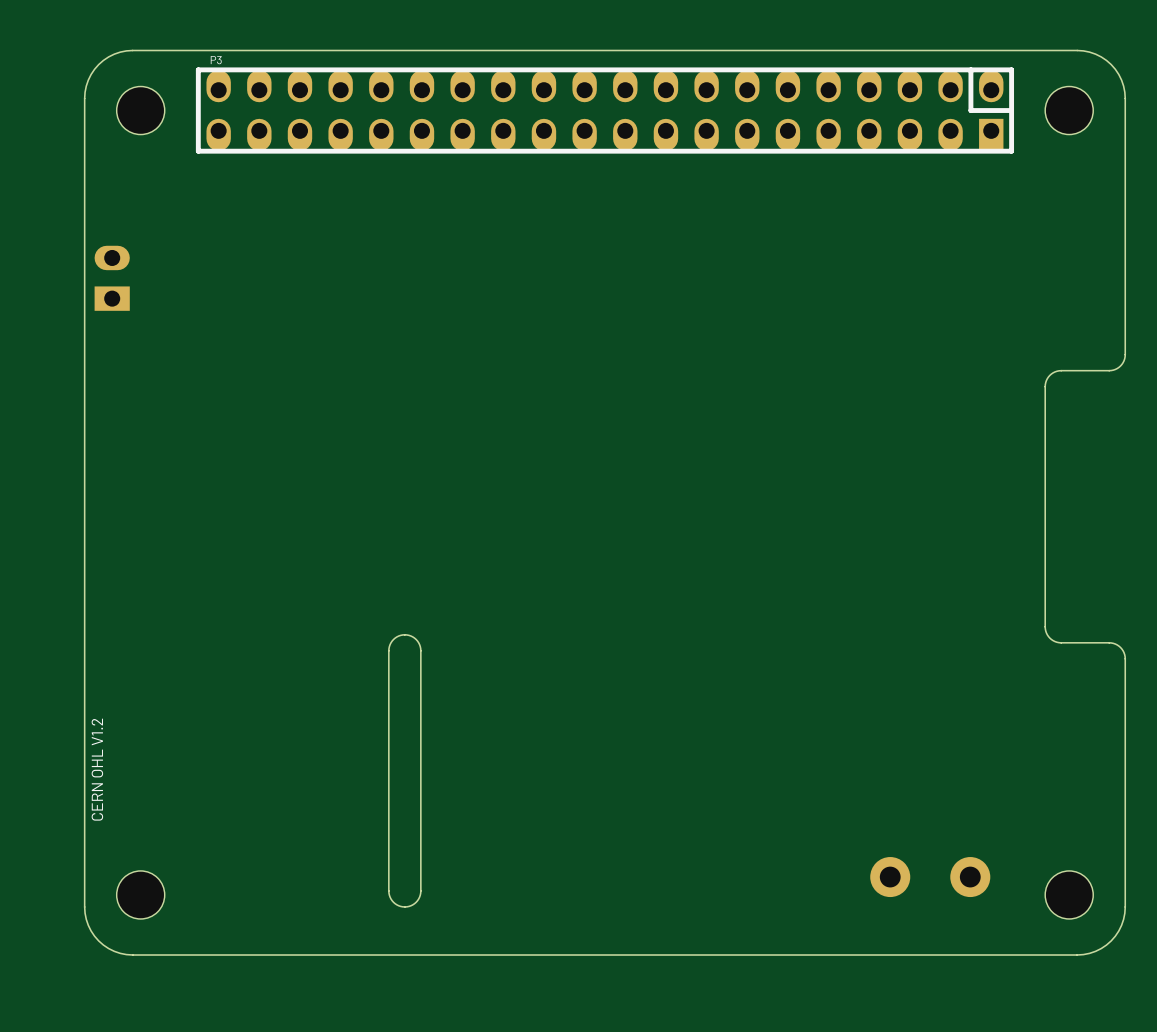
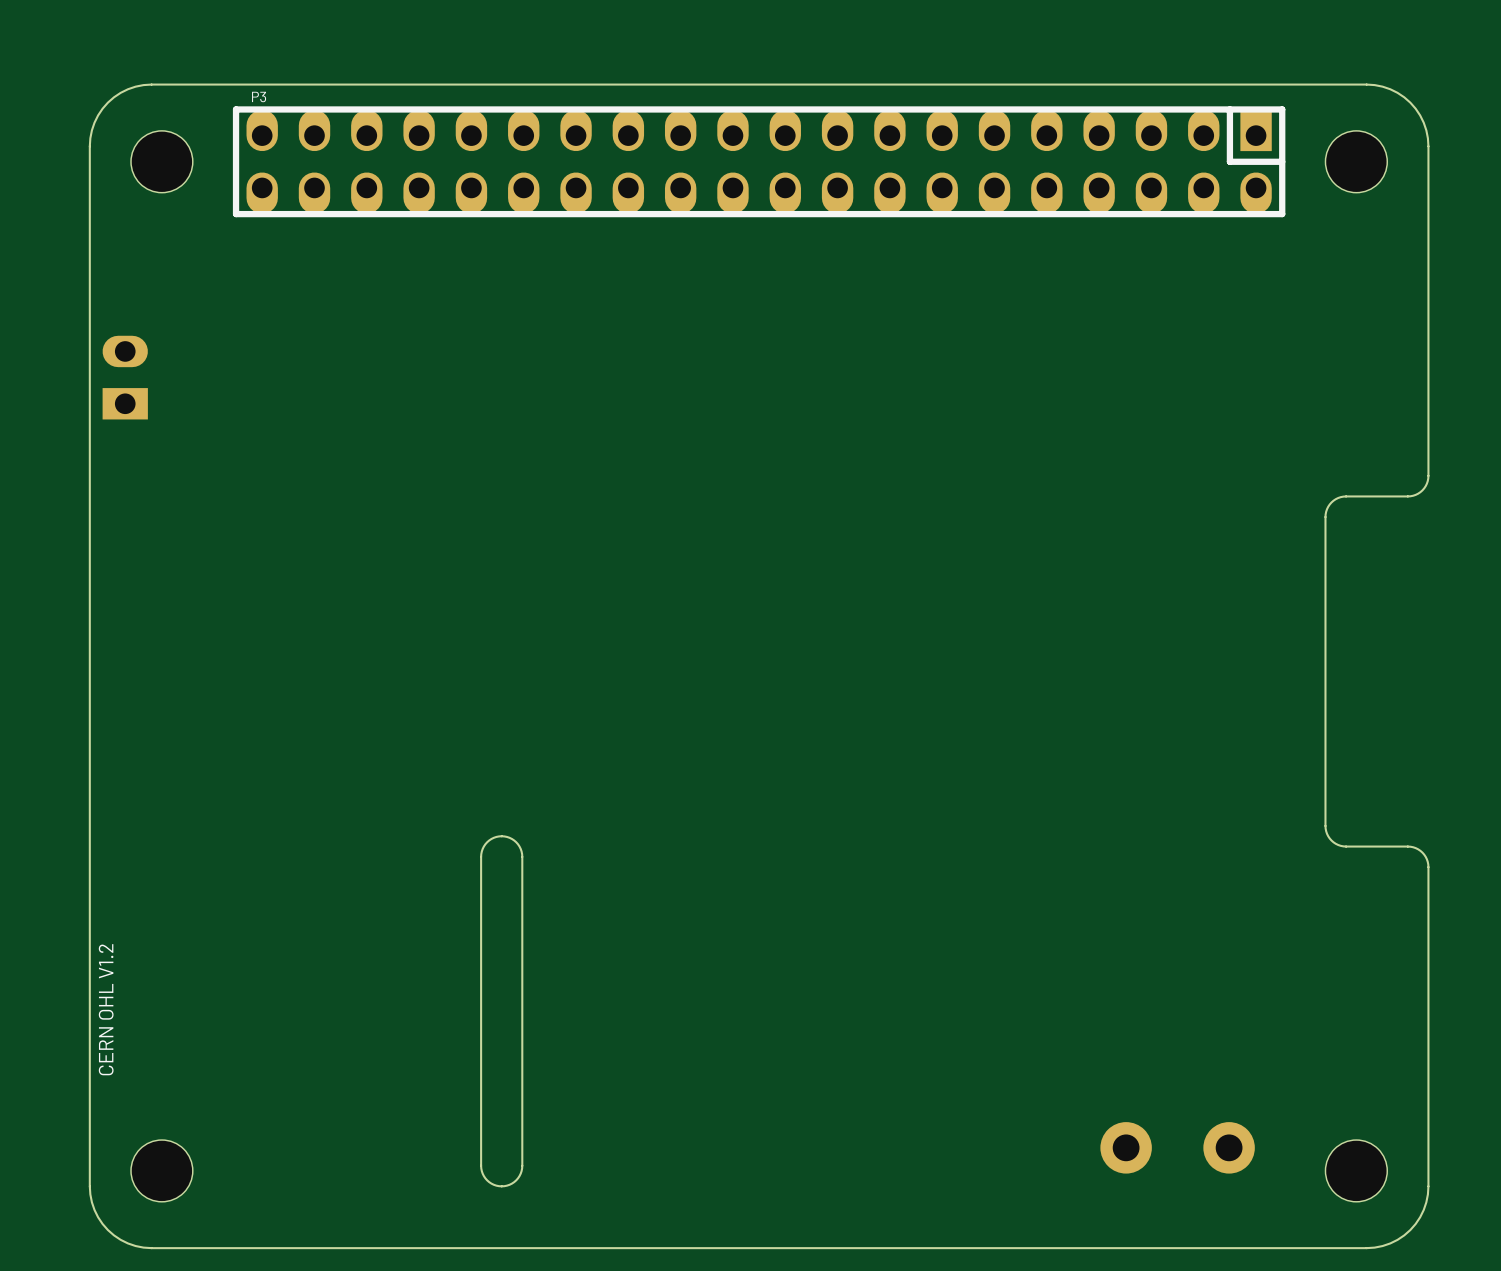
P3 footprint: [195, 67, 1015, 154] -> [232, 106, 1286, 218]

